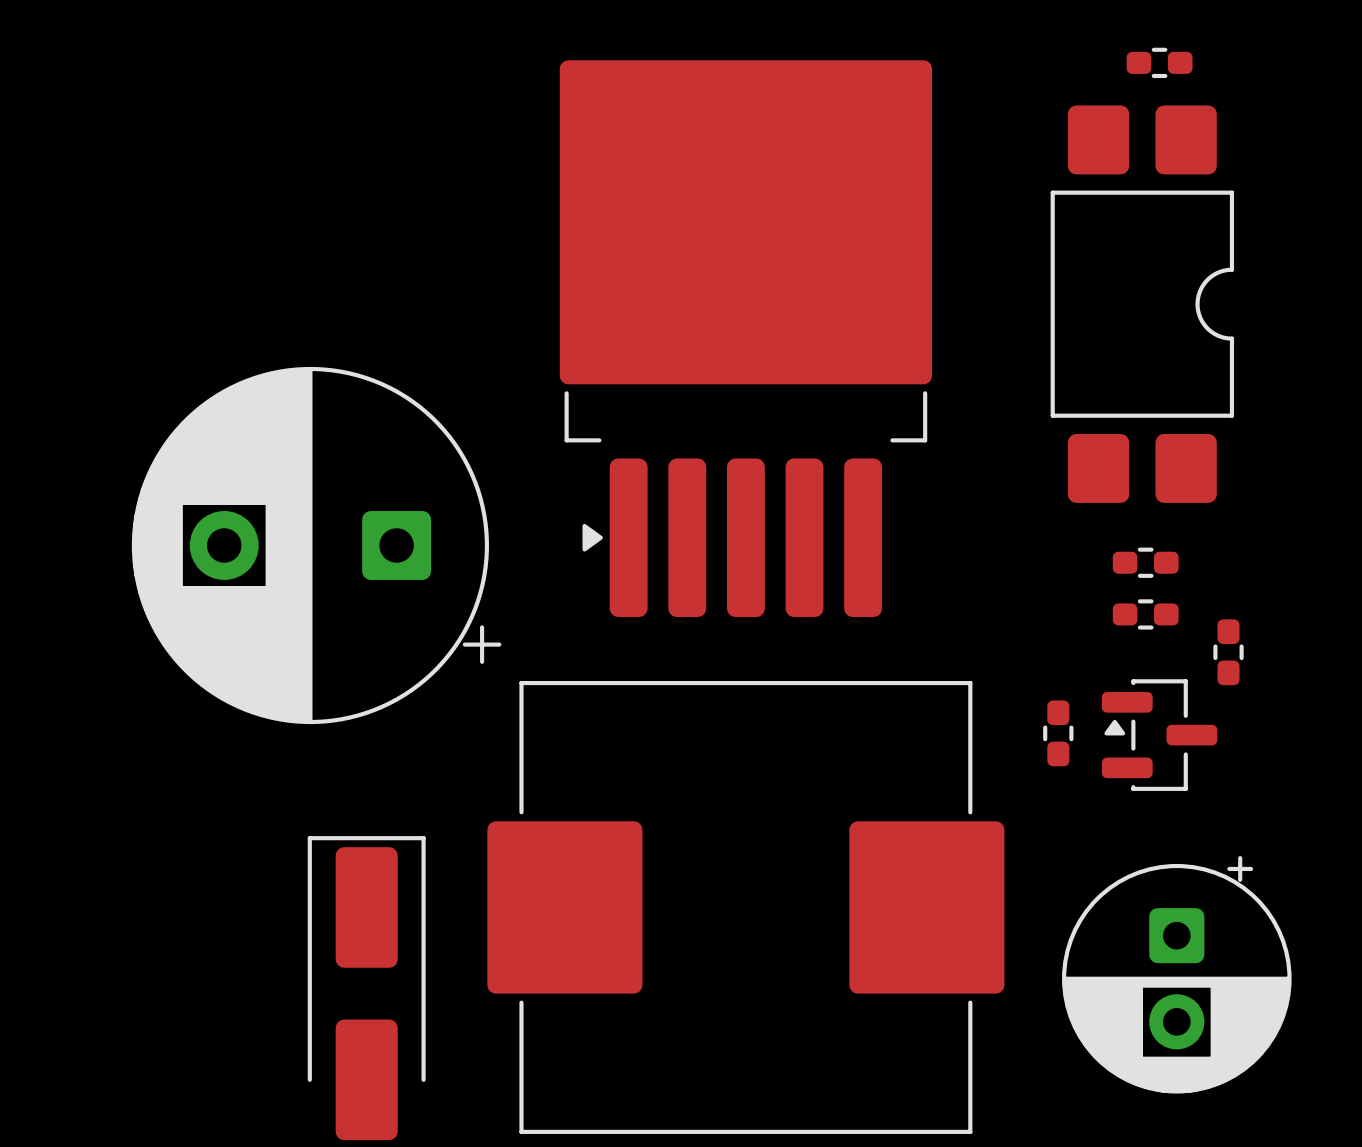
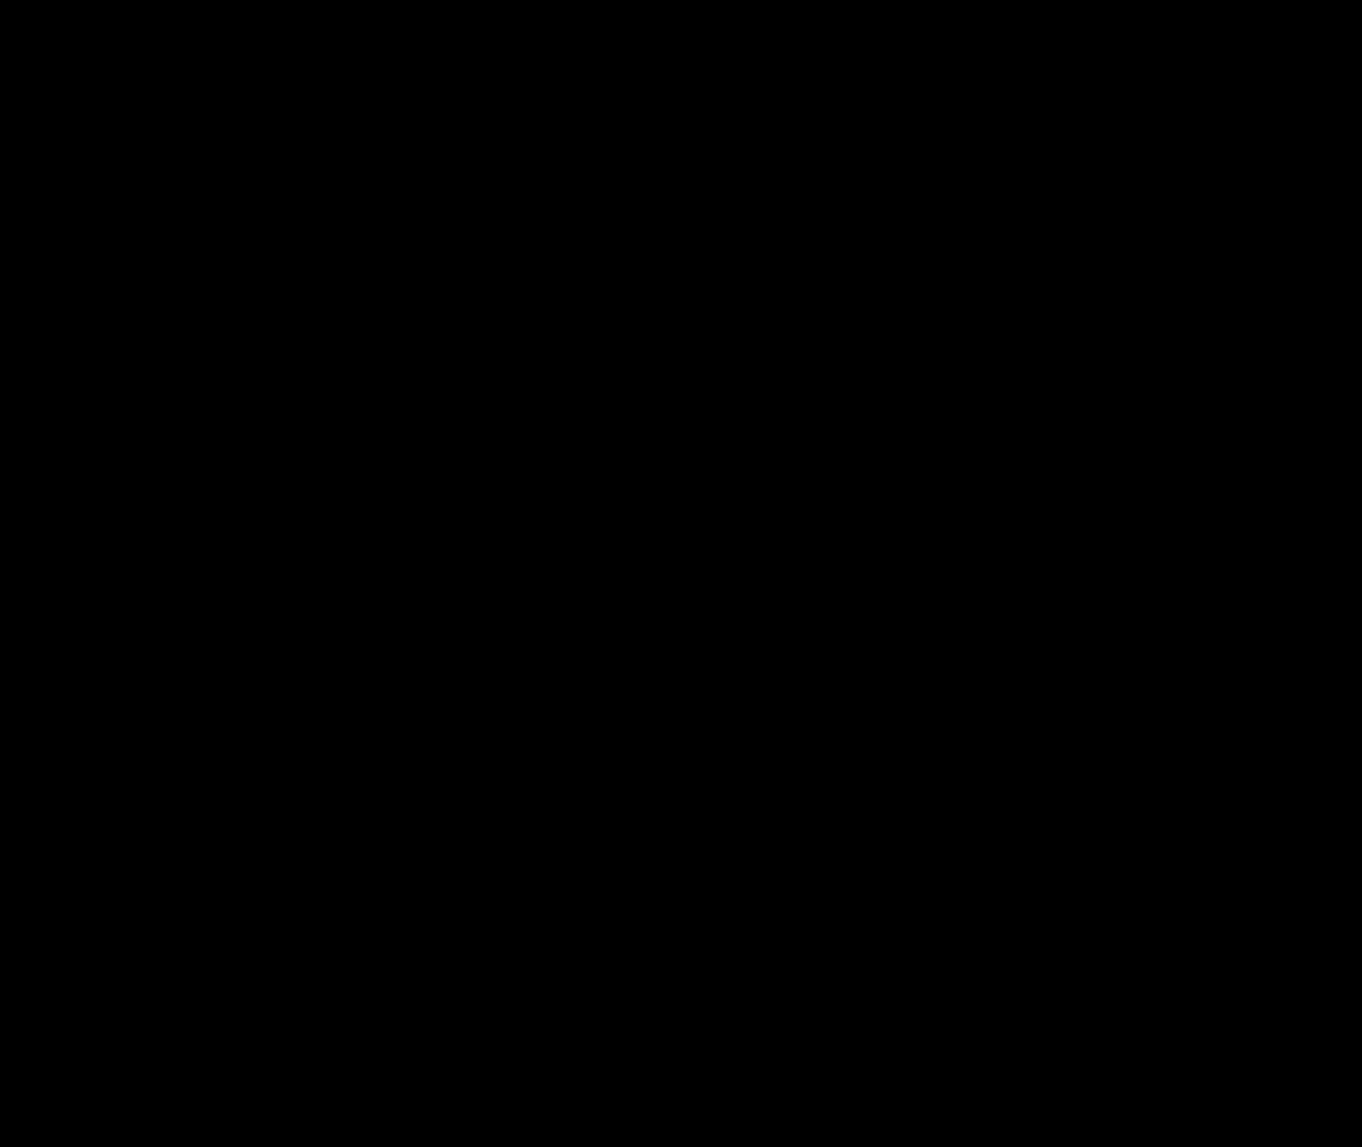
part: (1159, 62) -> none
part: (1142, 304) -> none
part: (745, 338) -> none
part: (316, 545) -> none
part: (1145, 562) -> none
part: (1145, 614) -> none
part: (1228, 652) -> none
part: (1058, 733) -> none
part: (1159, 735) -> none
part: (745, 907) -> none
part: (1176, 974) -> none
part: (366, 988) -> none

